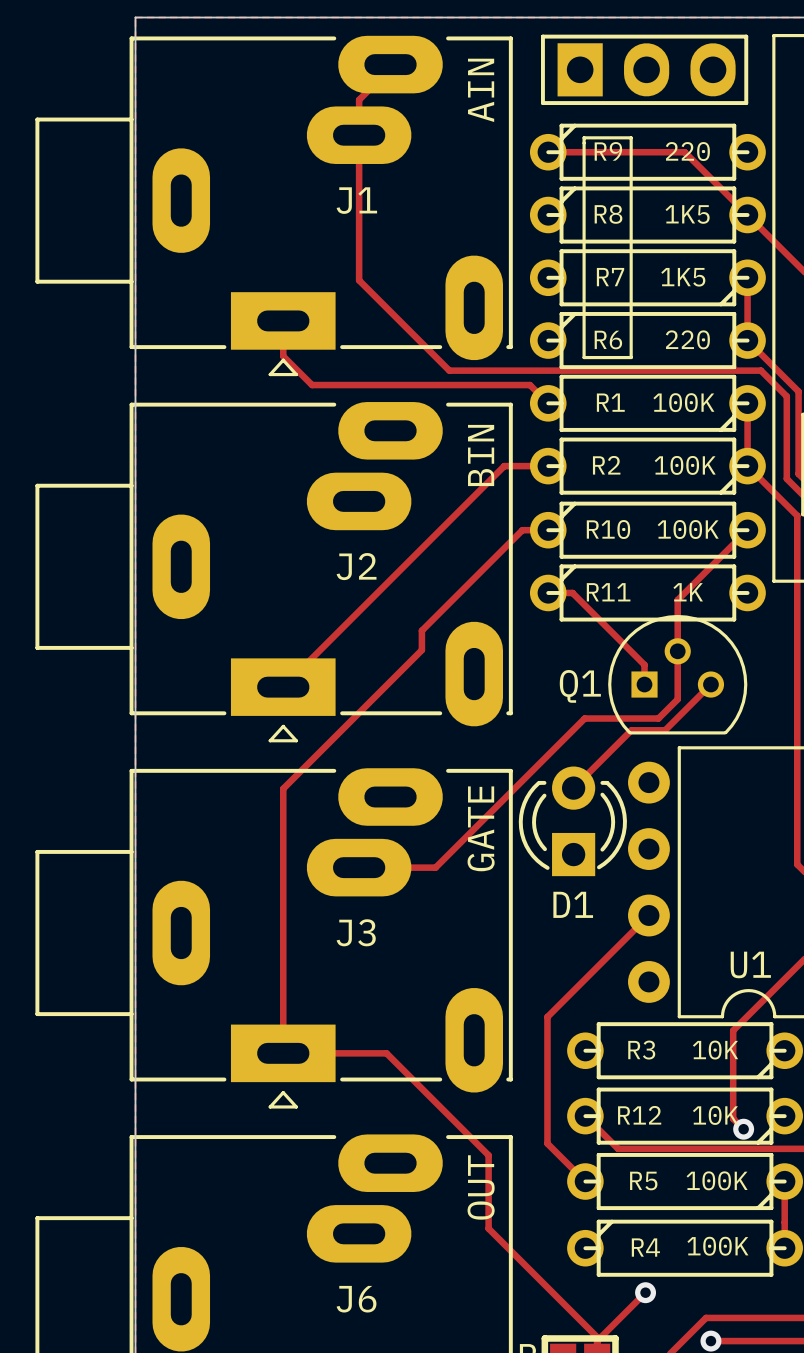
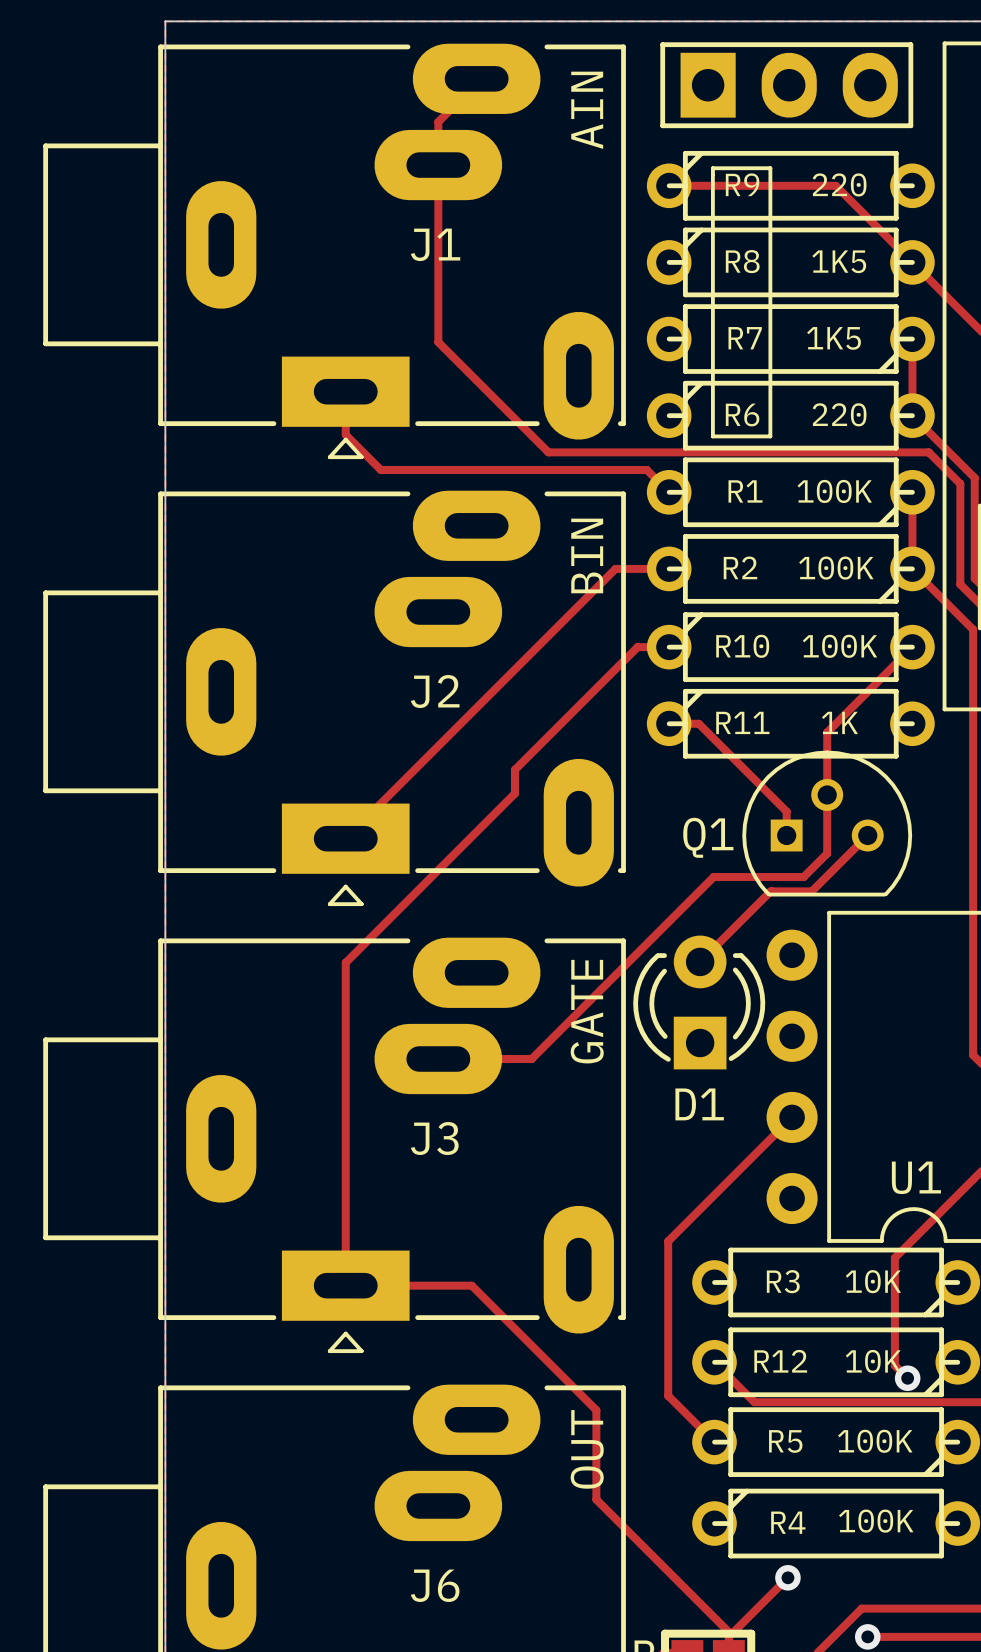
track: (784, 1181) (784, 1248) -> none

